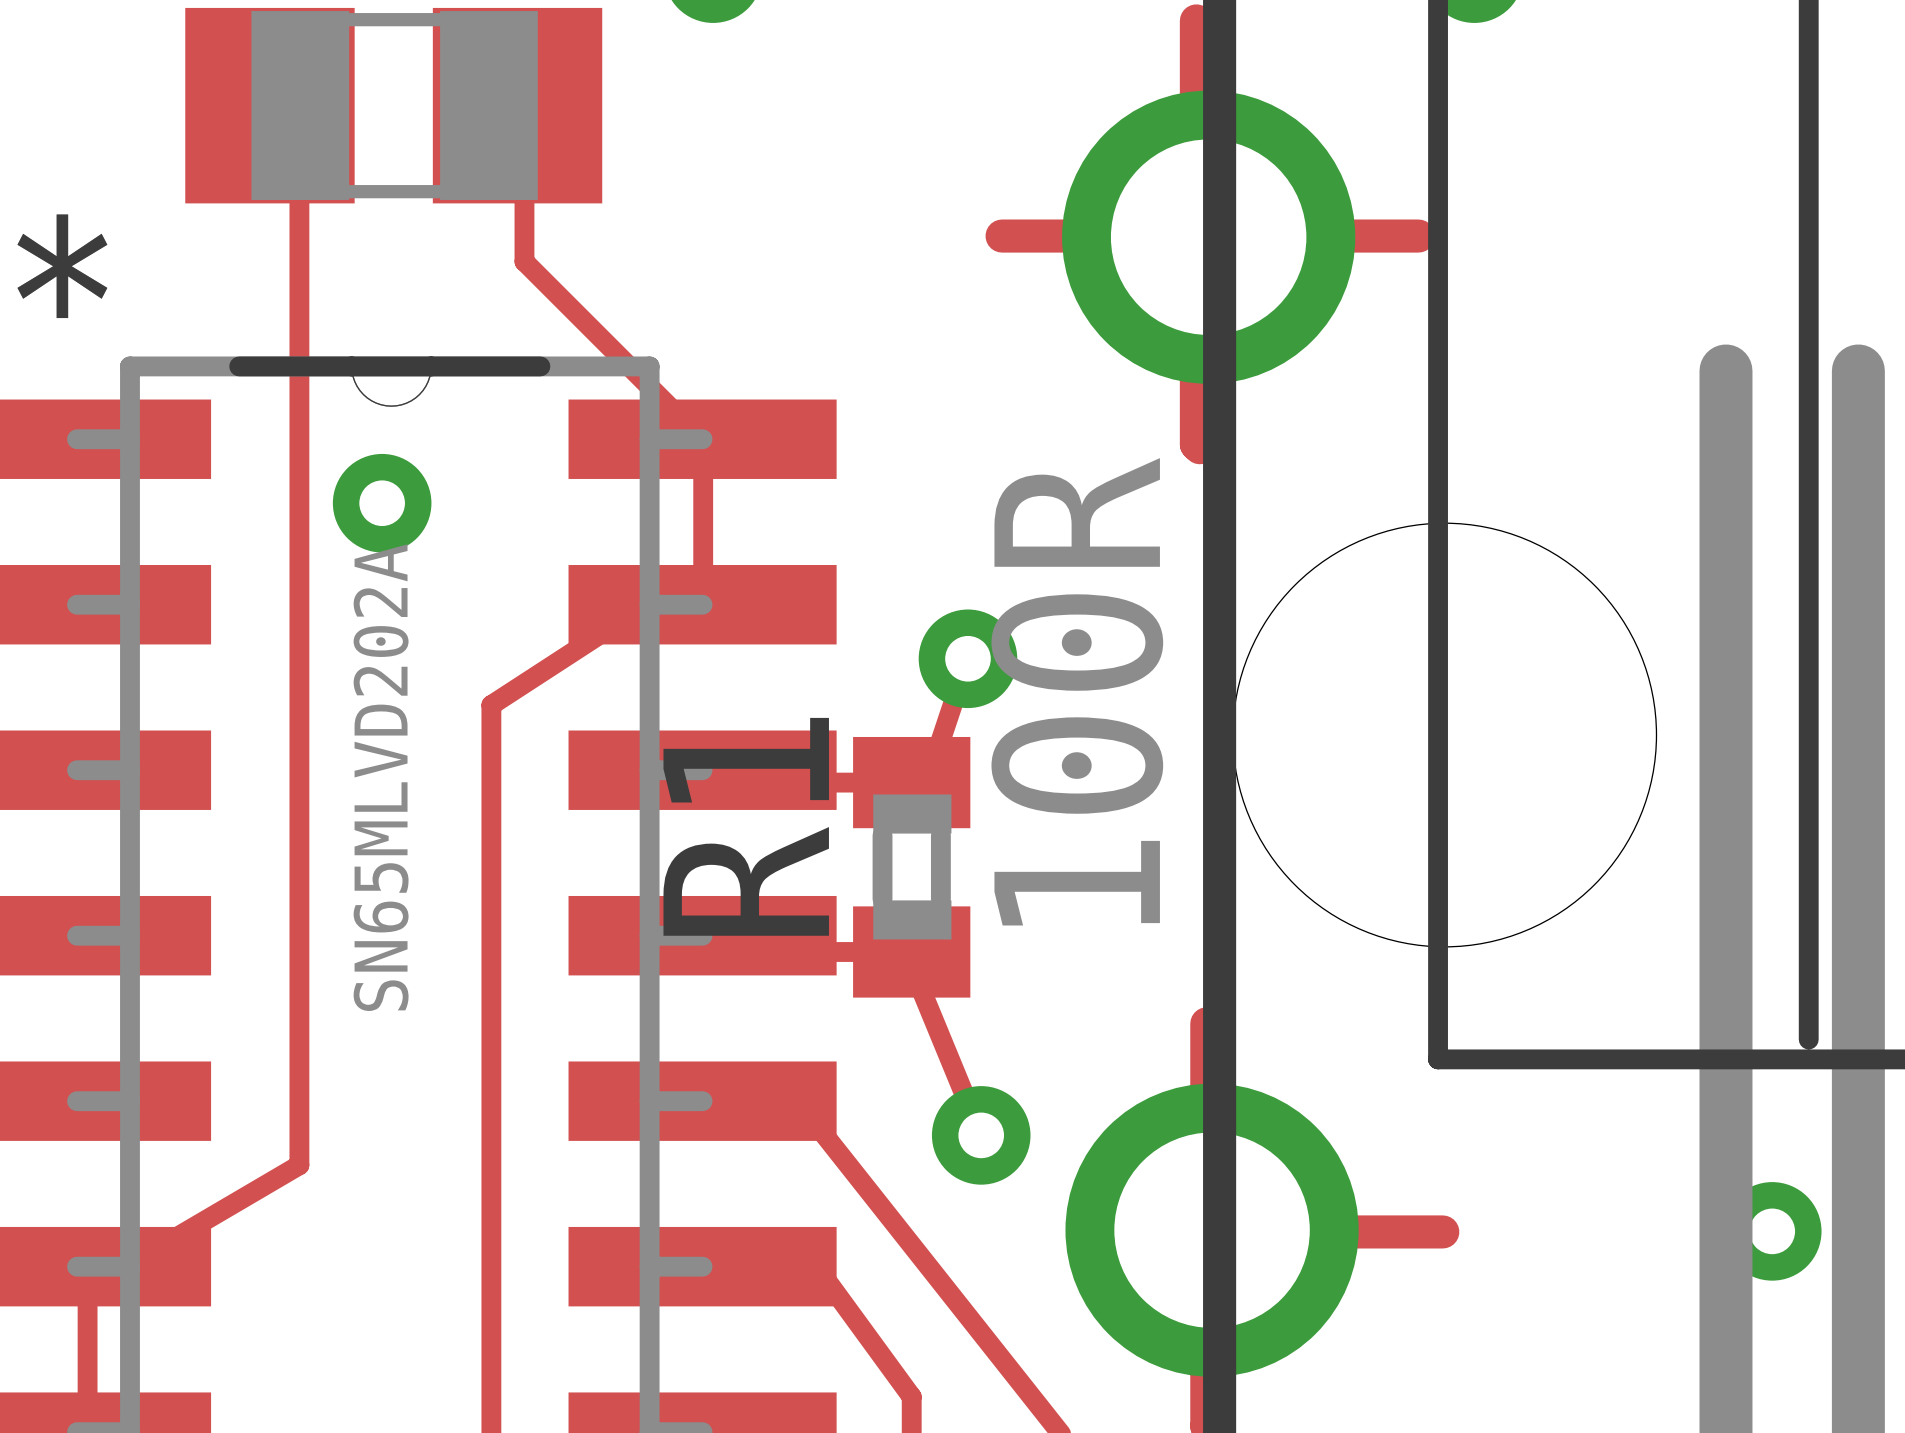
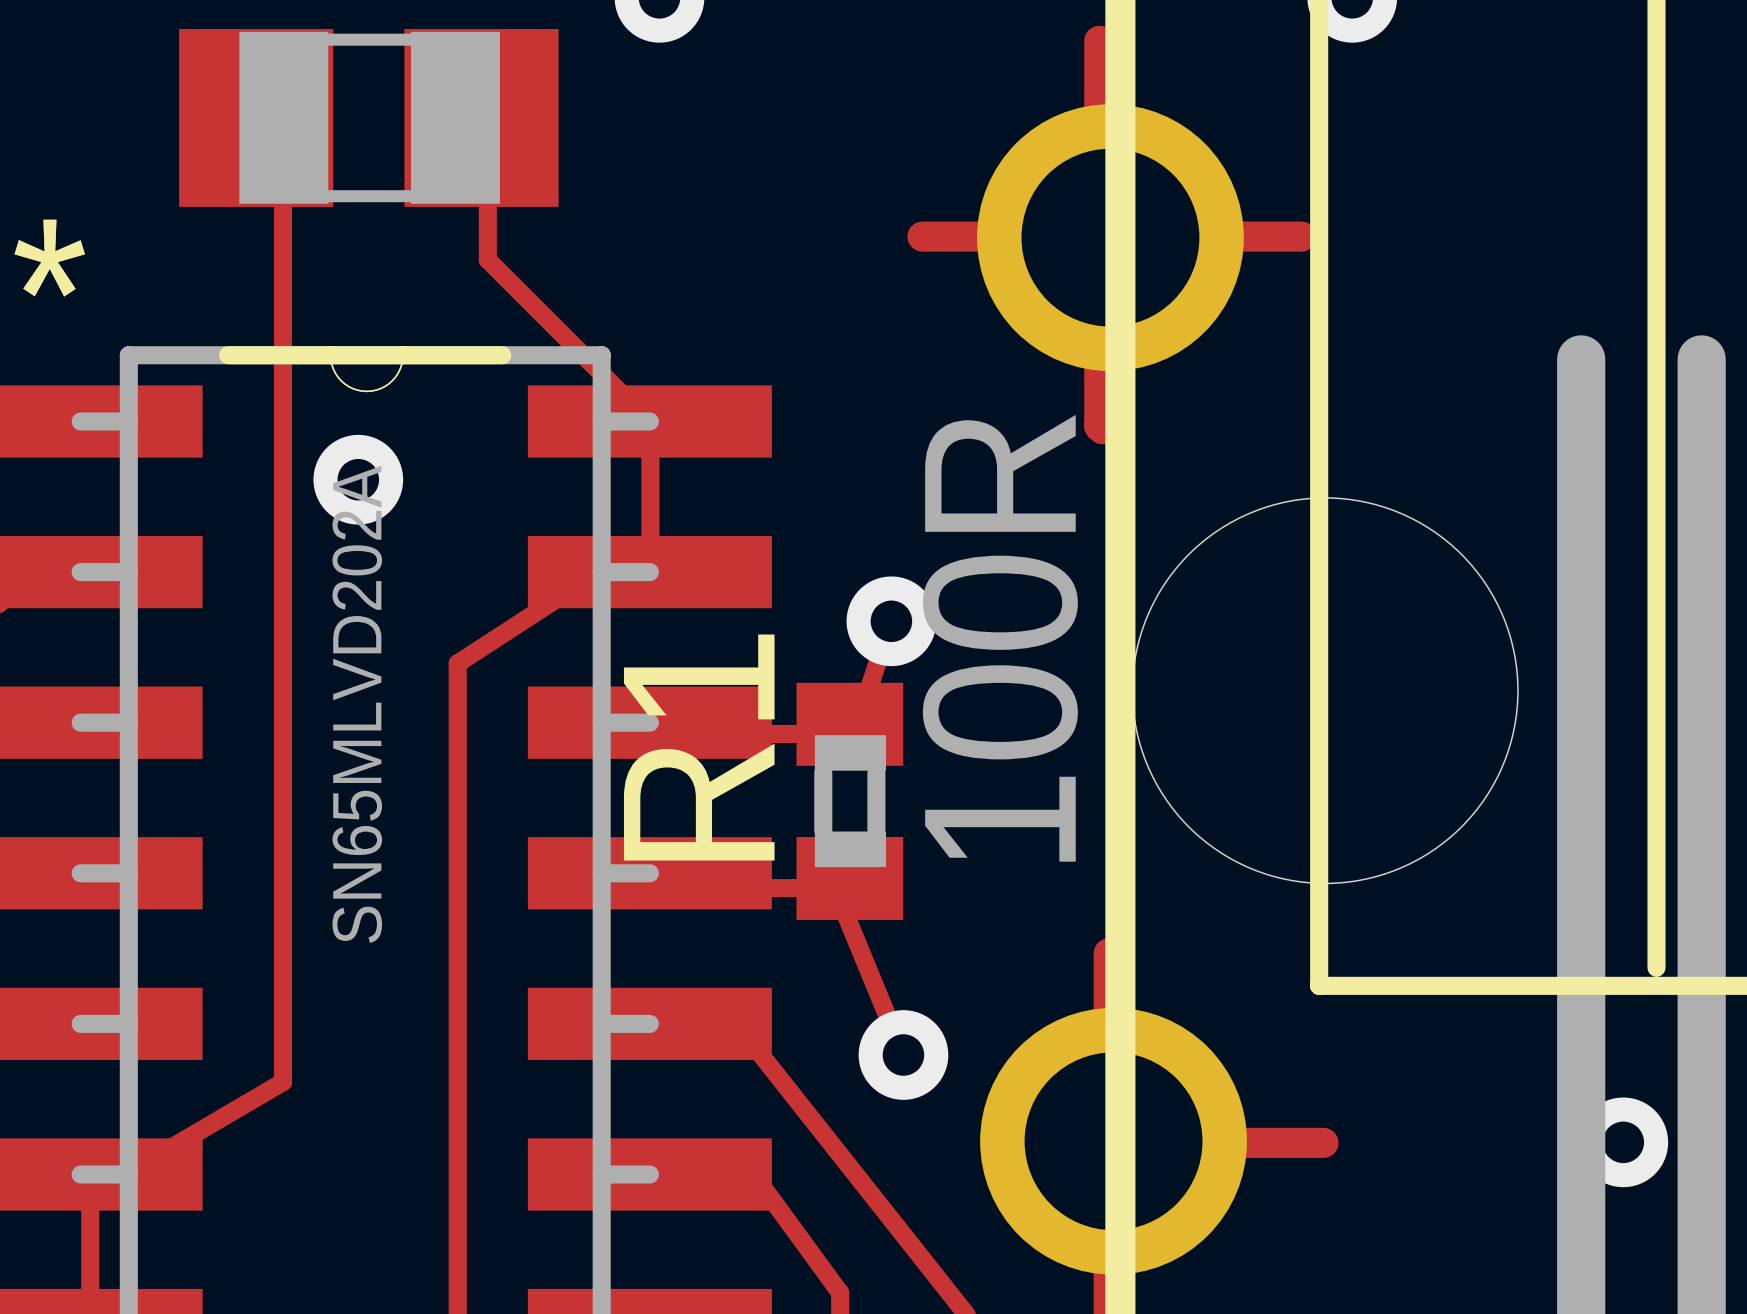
R1 position: (911, 867) -> (849, 801)

